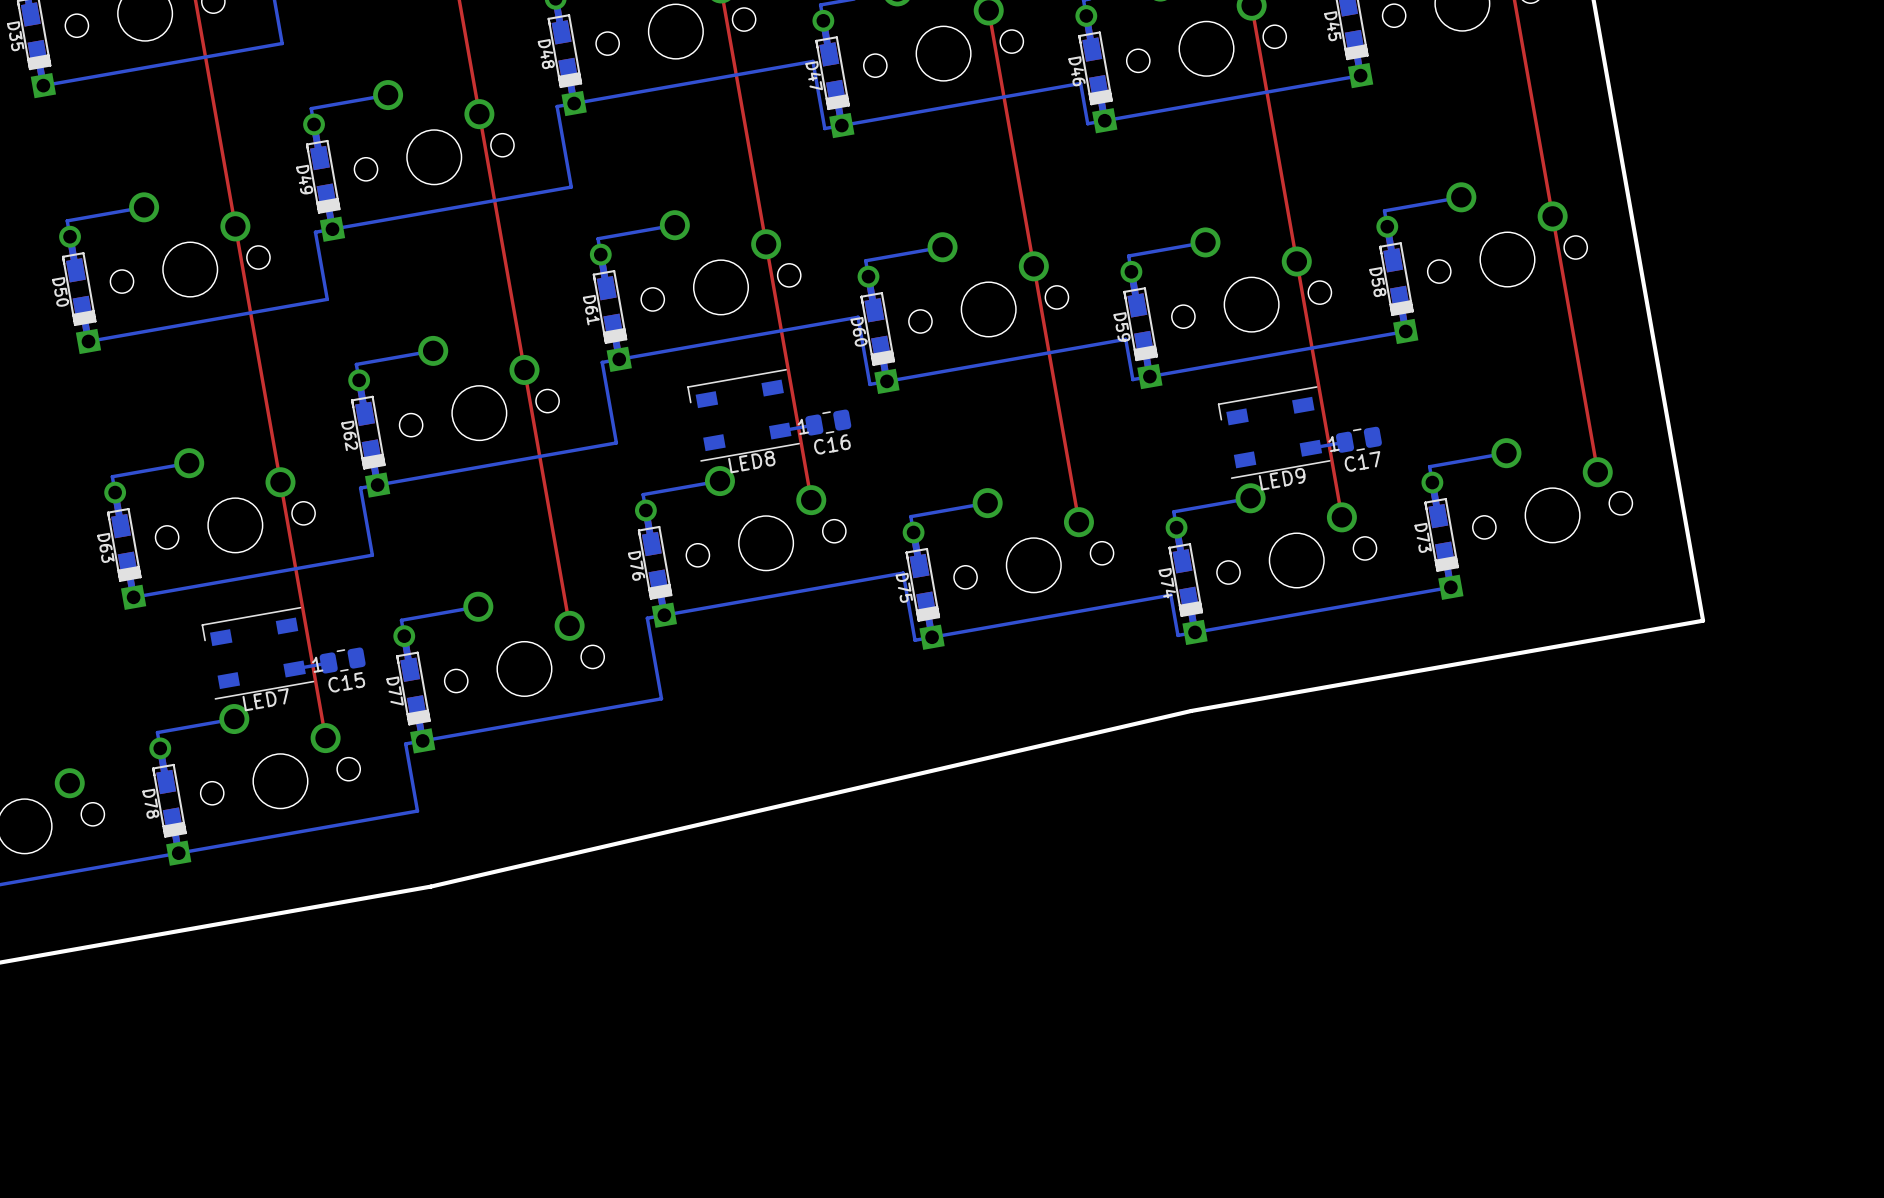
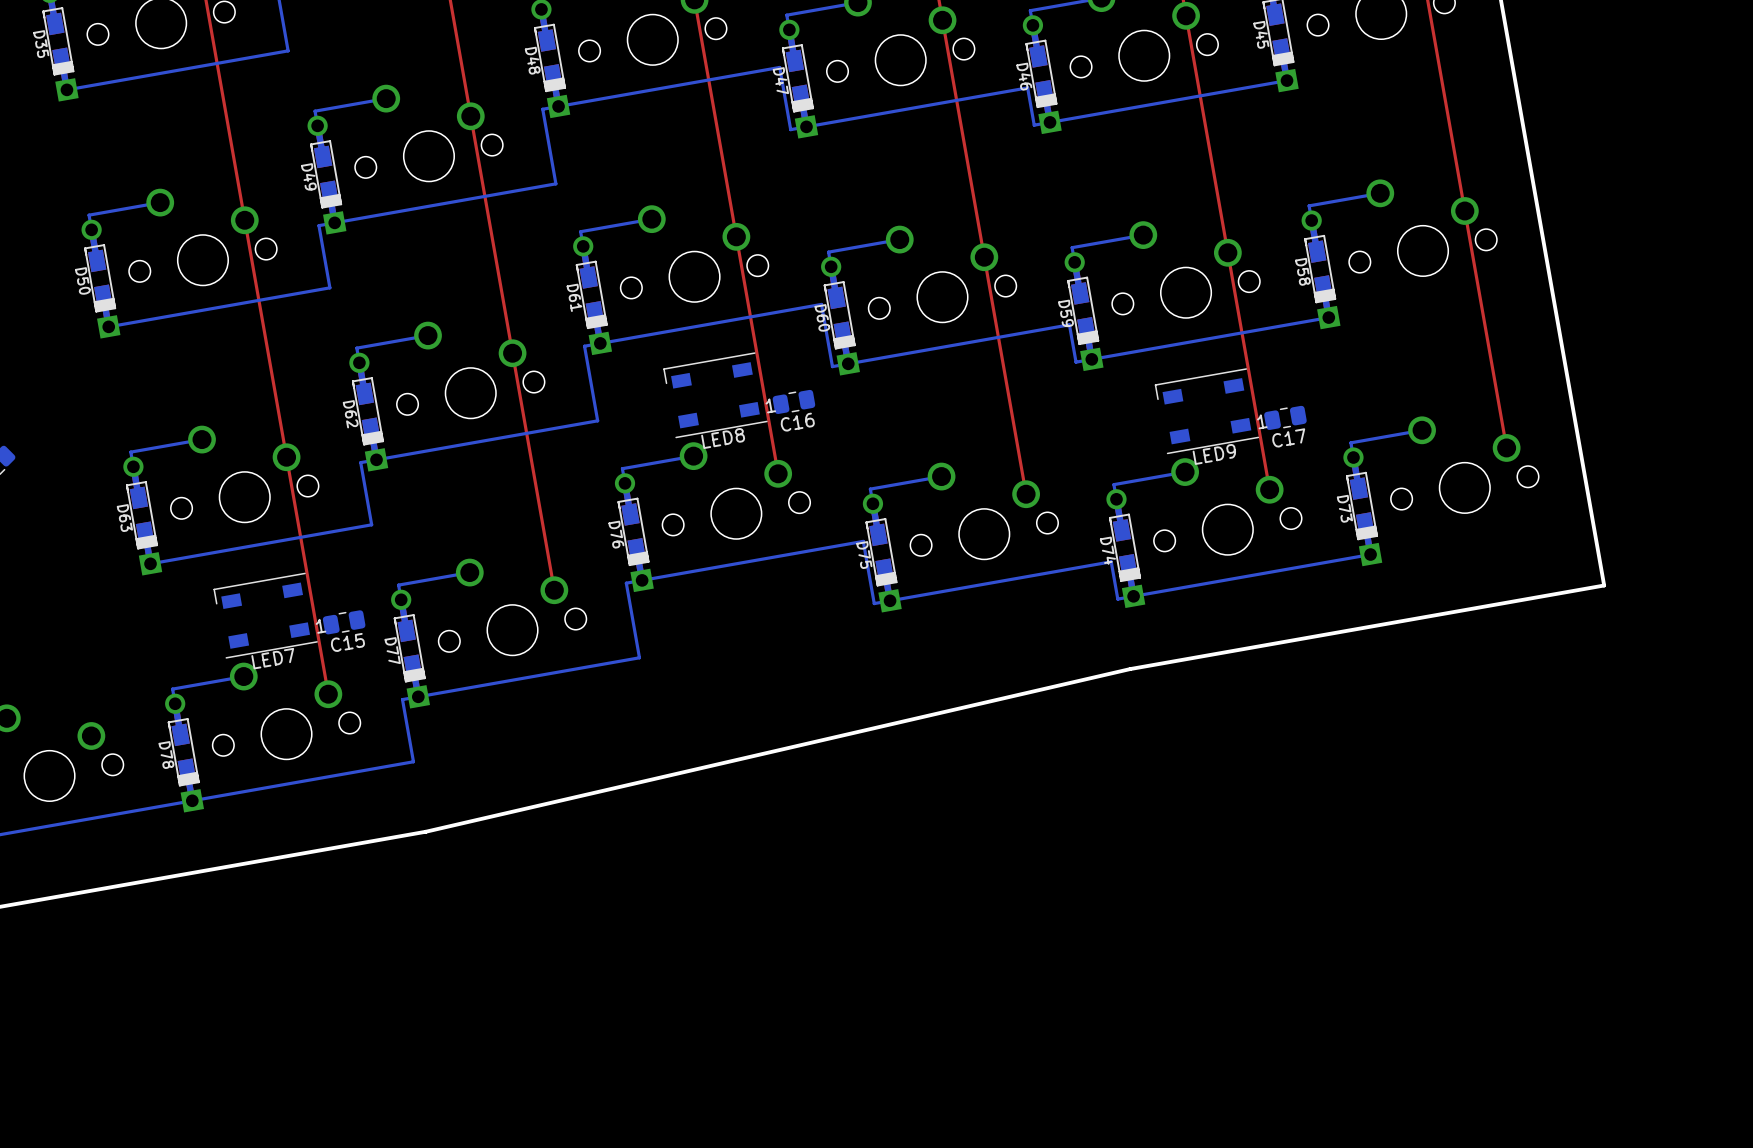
bottom track: (814, 425) (780, 431) -> none
bottom track: (1344, 442) (1310, 448) -> none
bottom track: (328, 662) (294, 668) -> none

